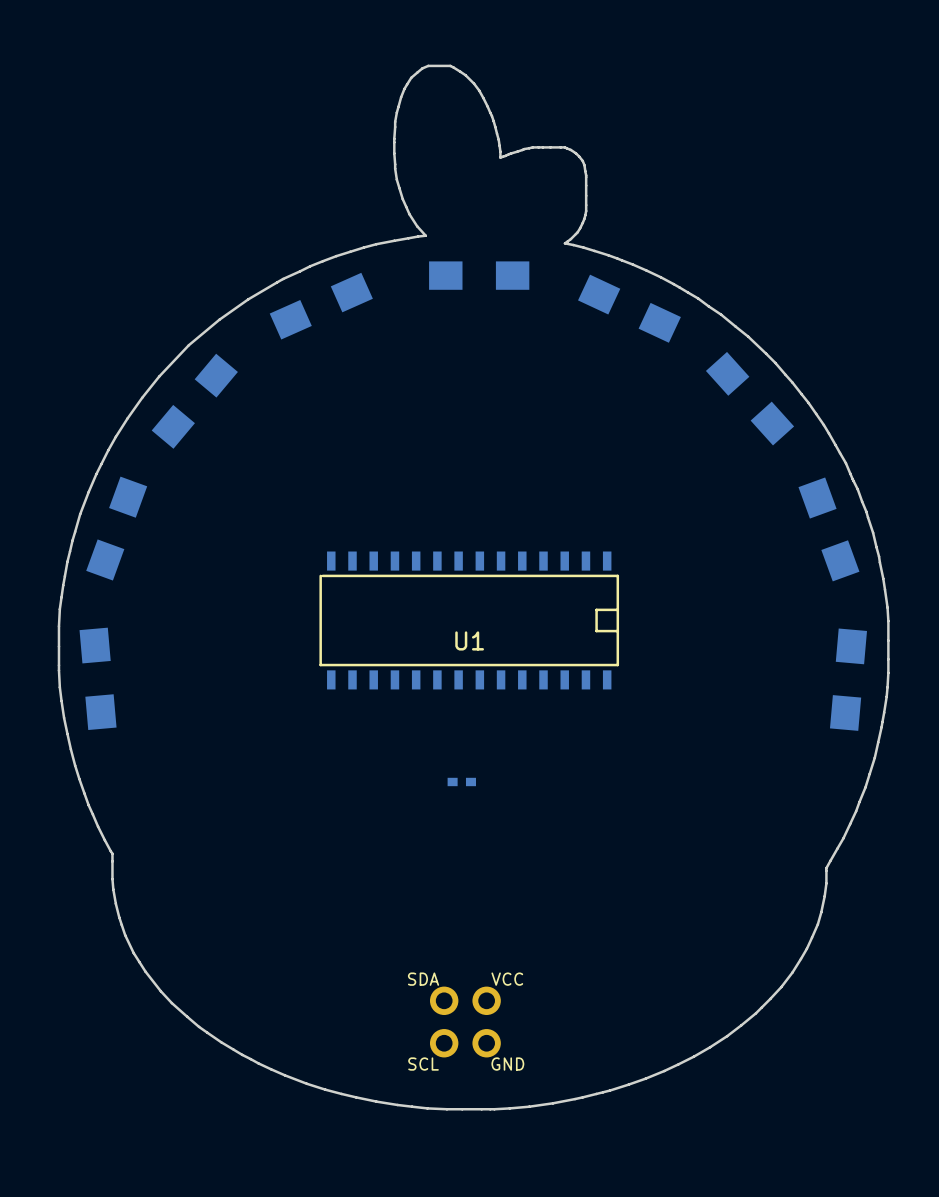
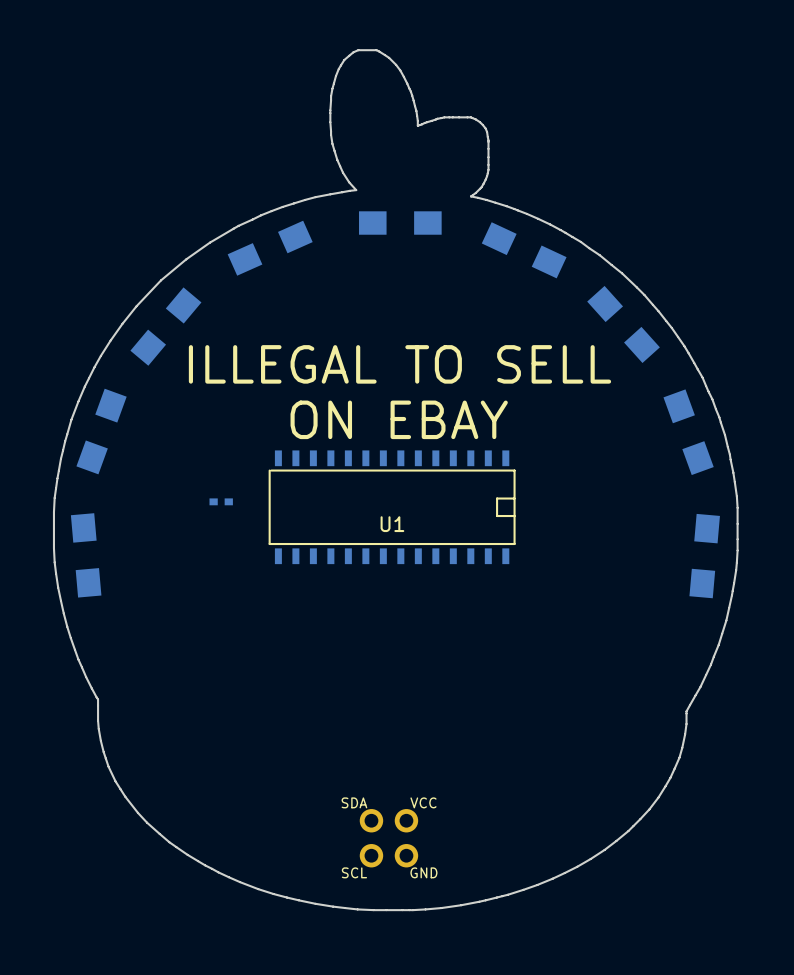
text: none -> ILLEGAL TO SELL (399, 364)
text: none -> ON EBAY (399, 419)
part position: (461, 781) -> (221, 501)

